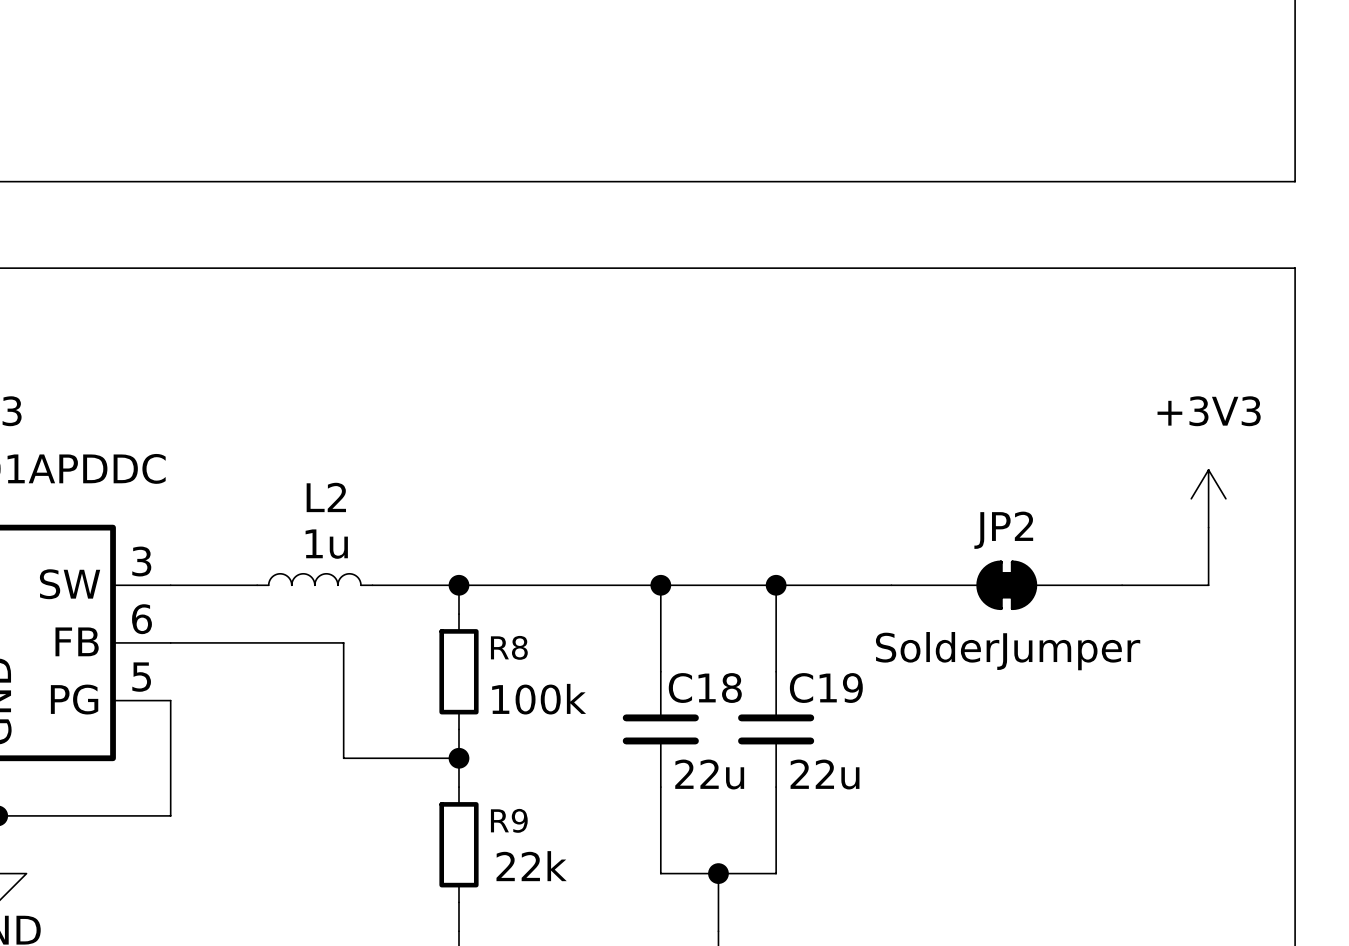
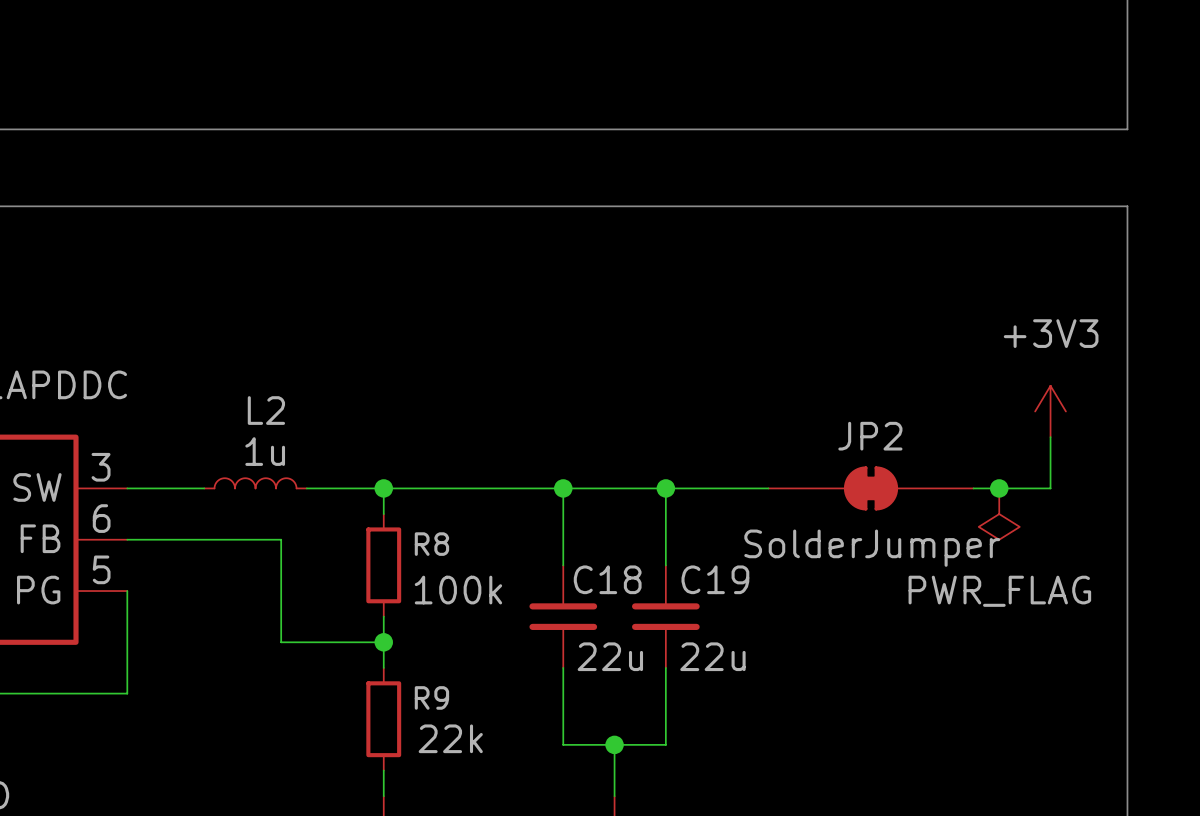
junction: none -> (999, 488)
power symbol: none -> PWR_FLAG (999, 514)

